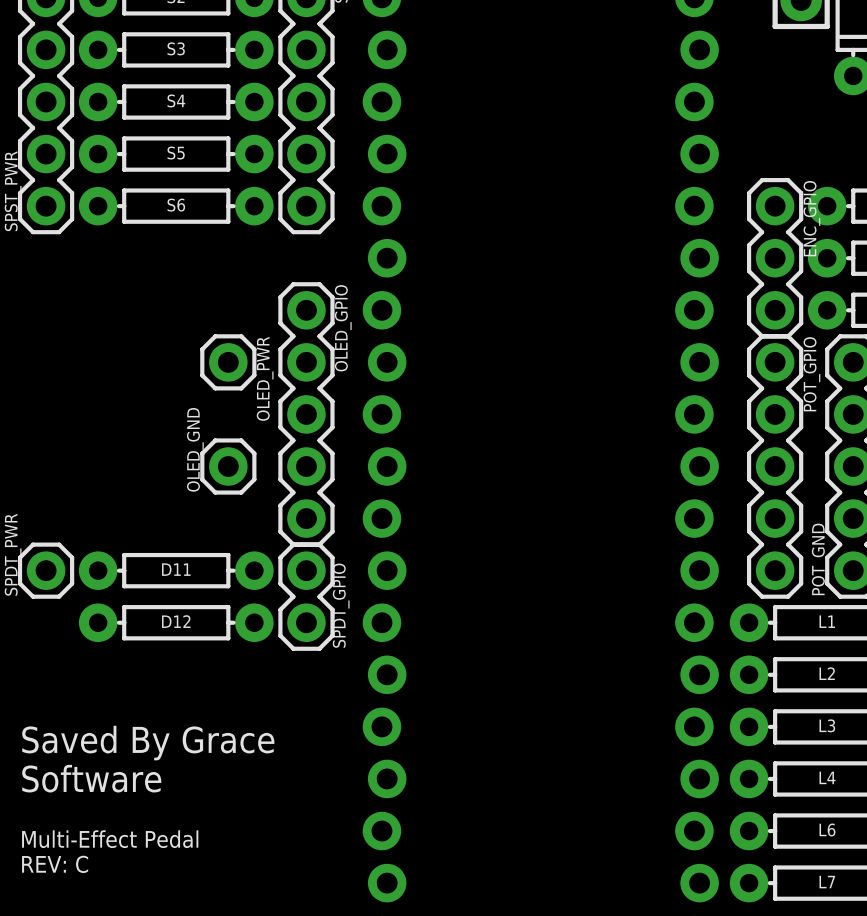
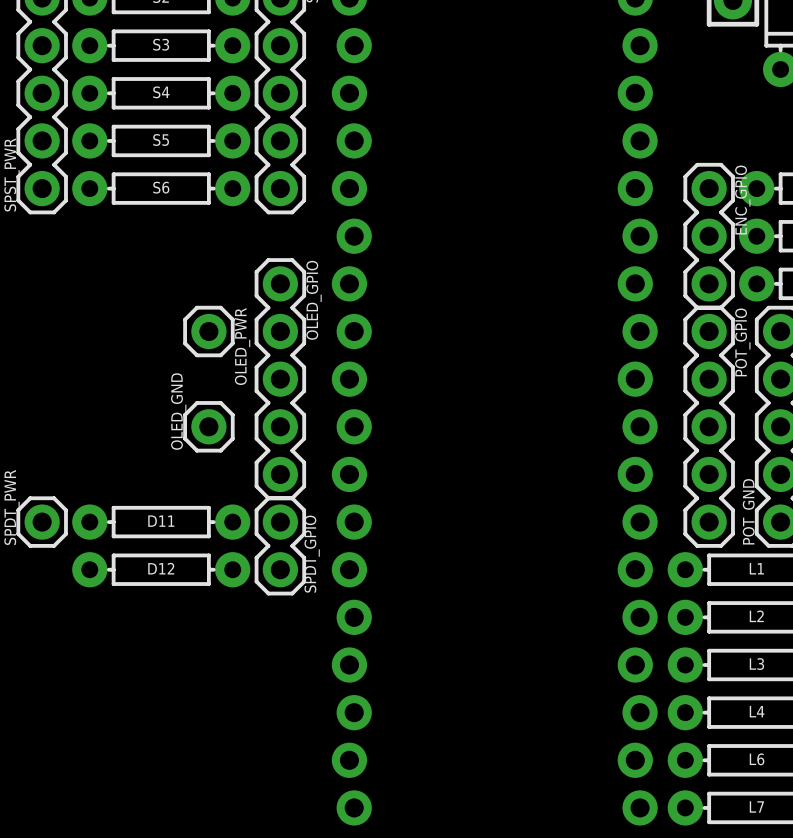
text: Saved By Grace (148, 743) -> none
text: Software (91, 778) -> none
text: Multi-Effect Pedal (110, 839) -> none
text: REV: C (55, 864) -> none

